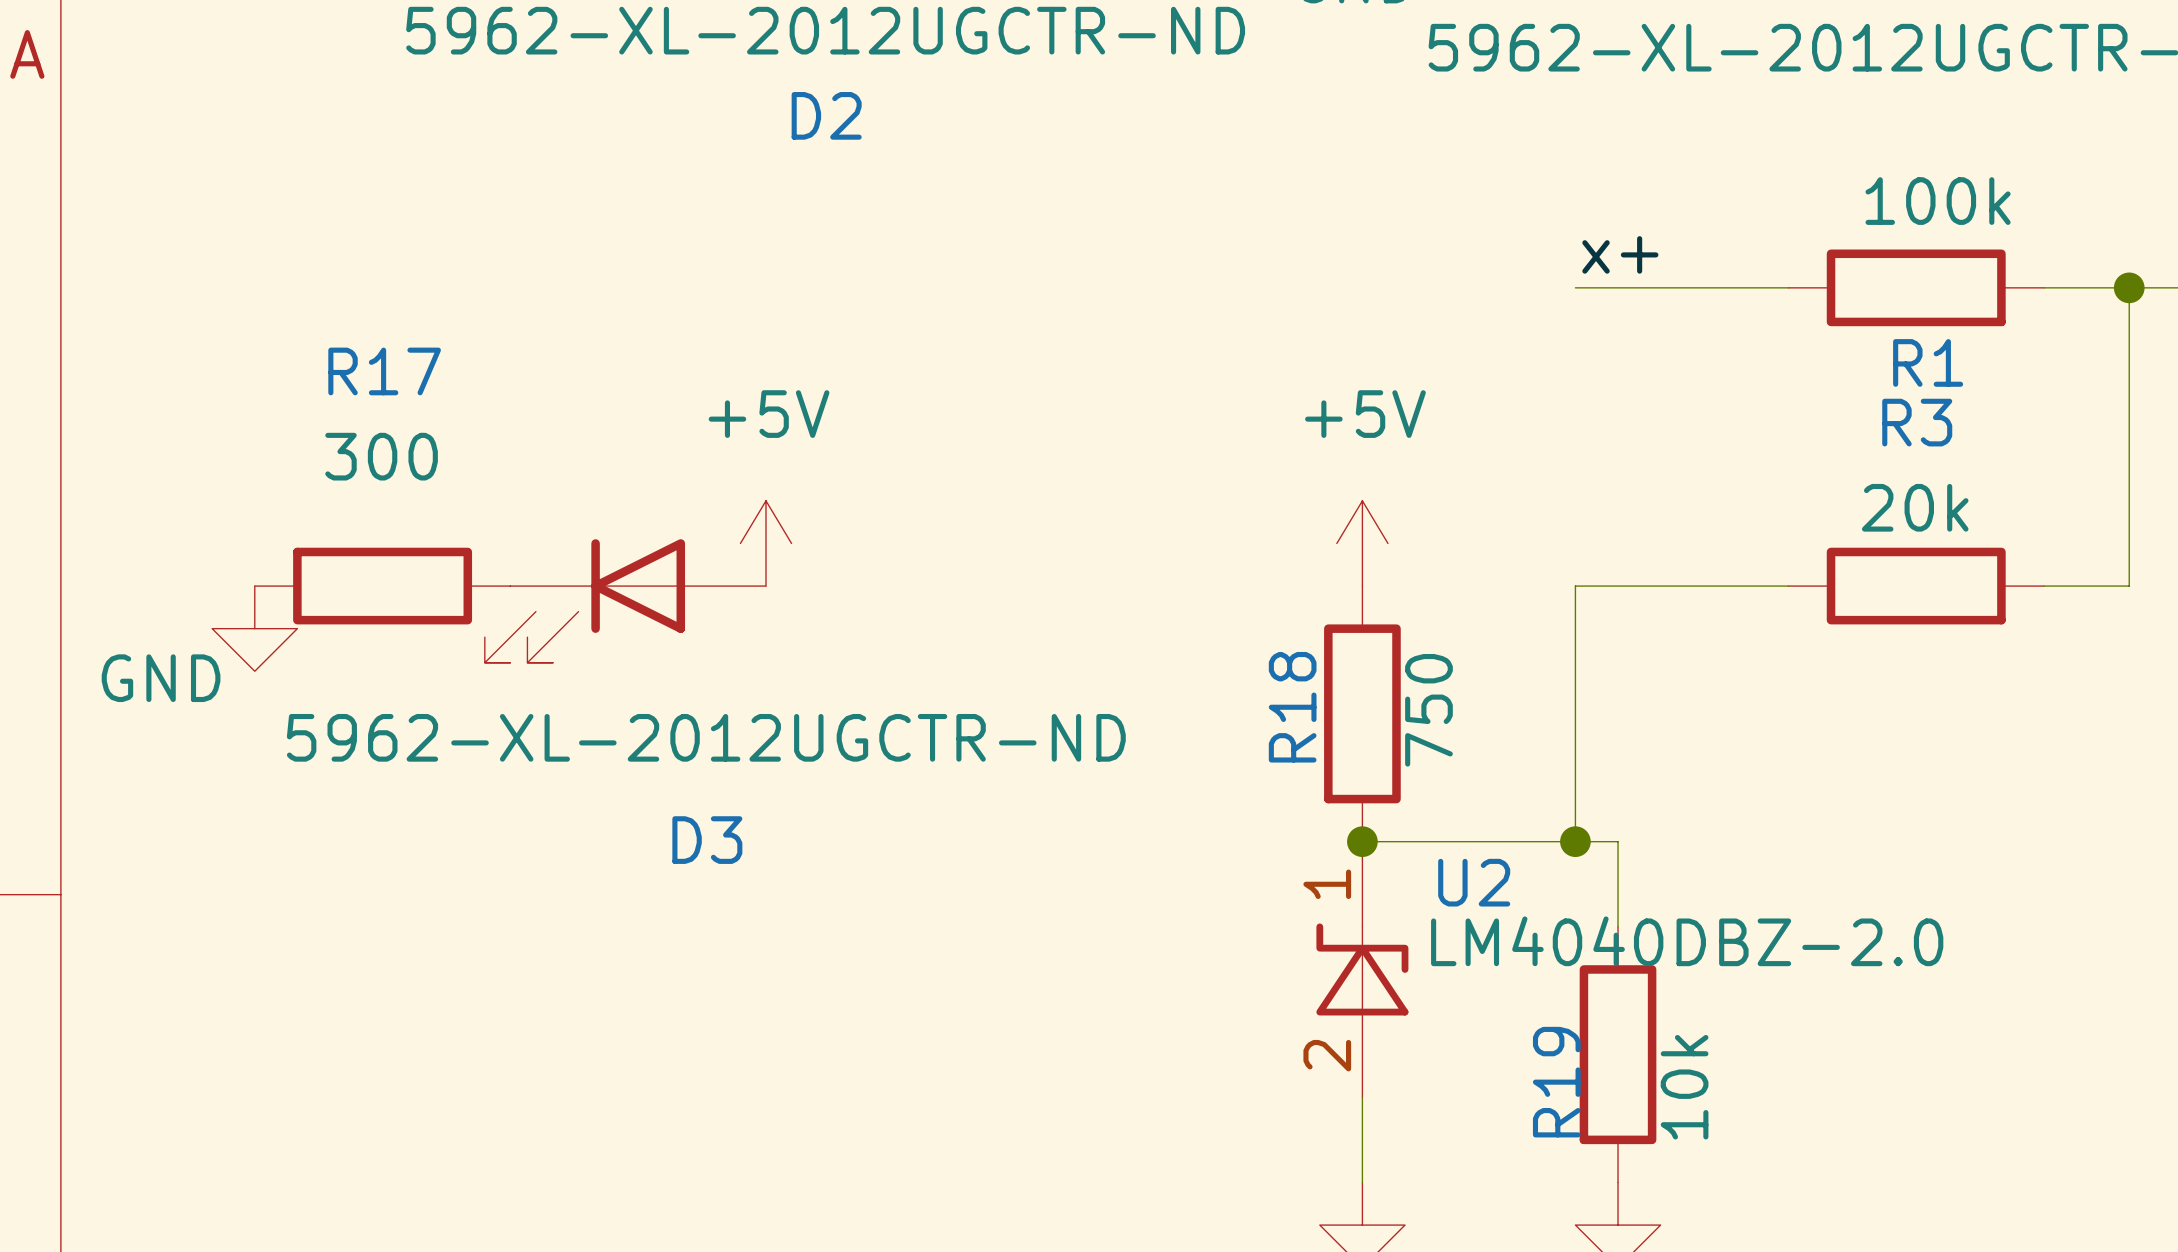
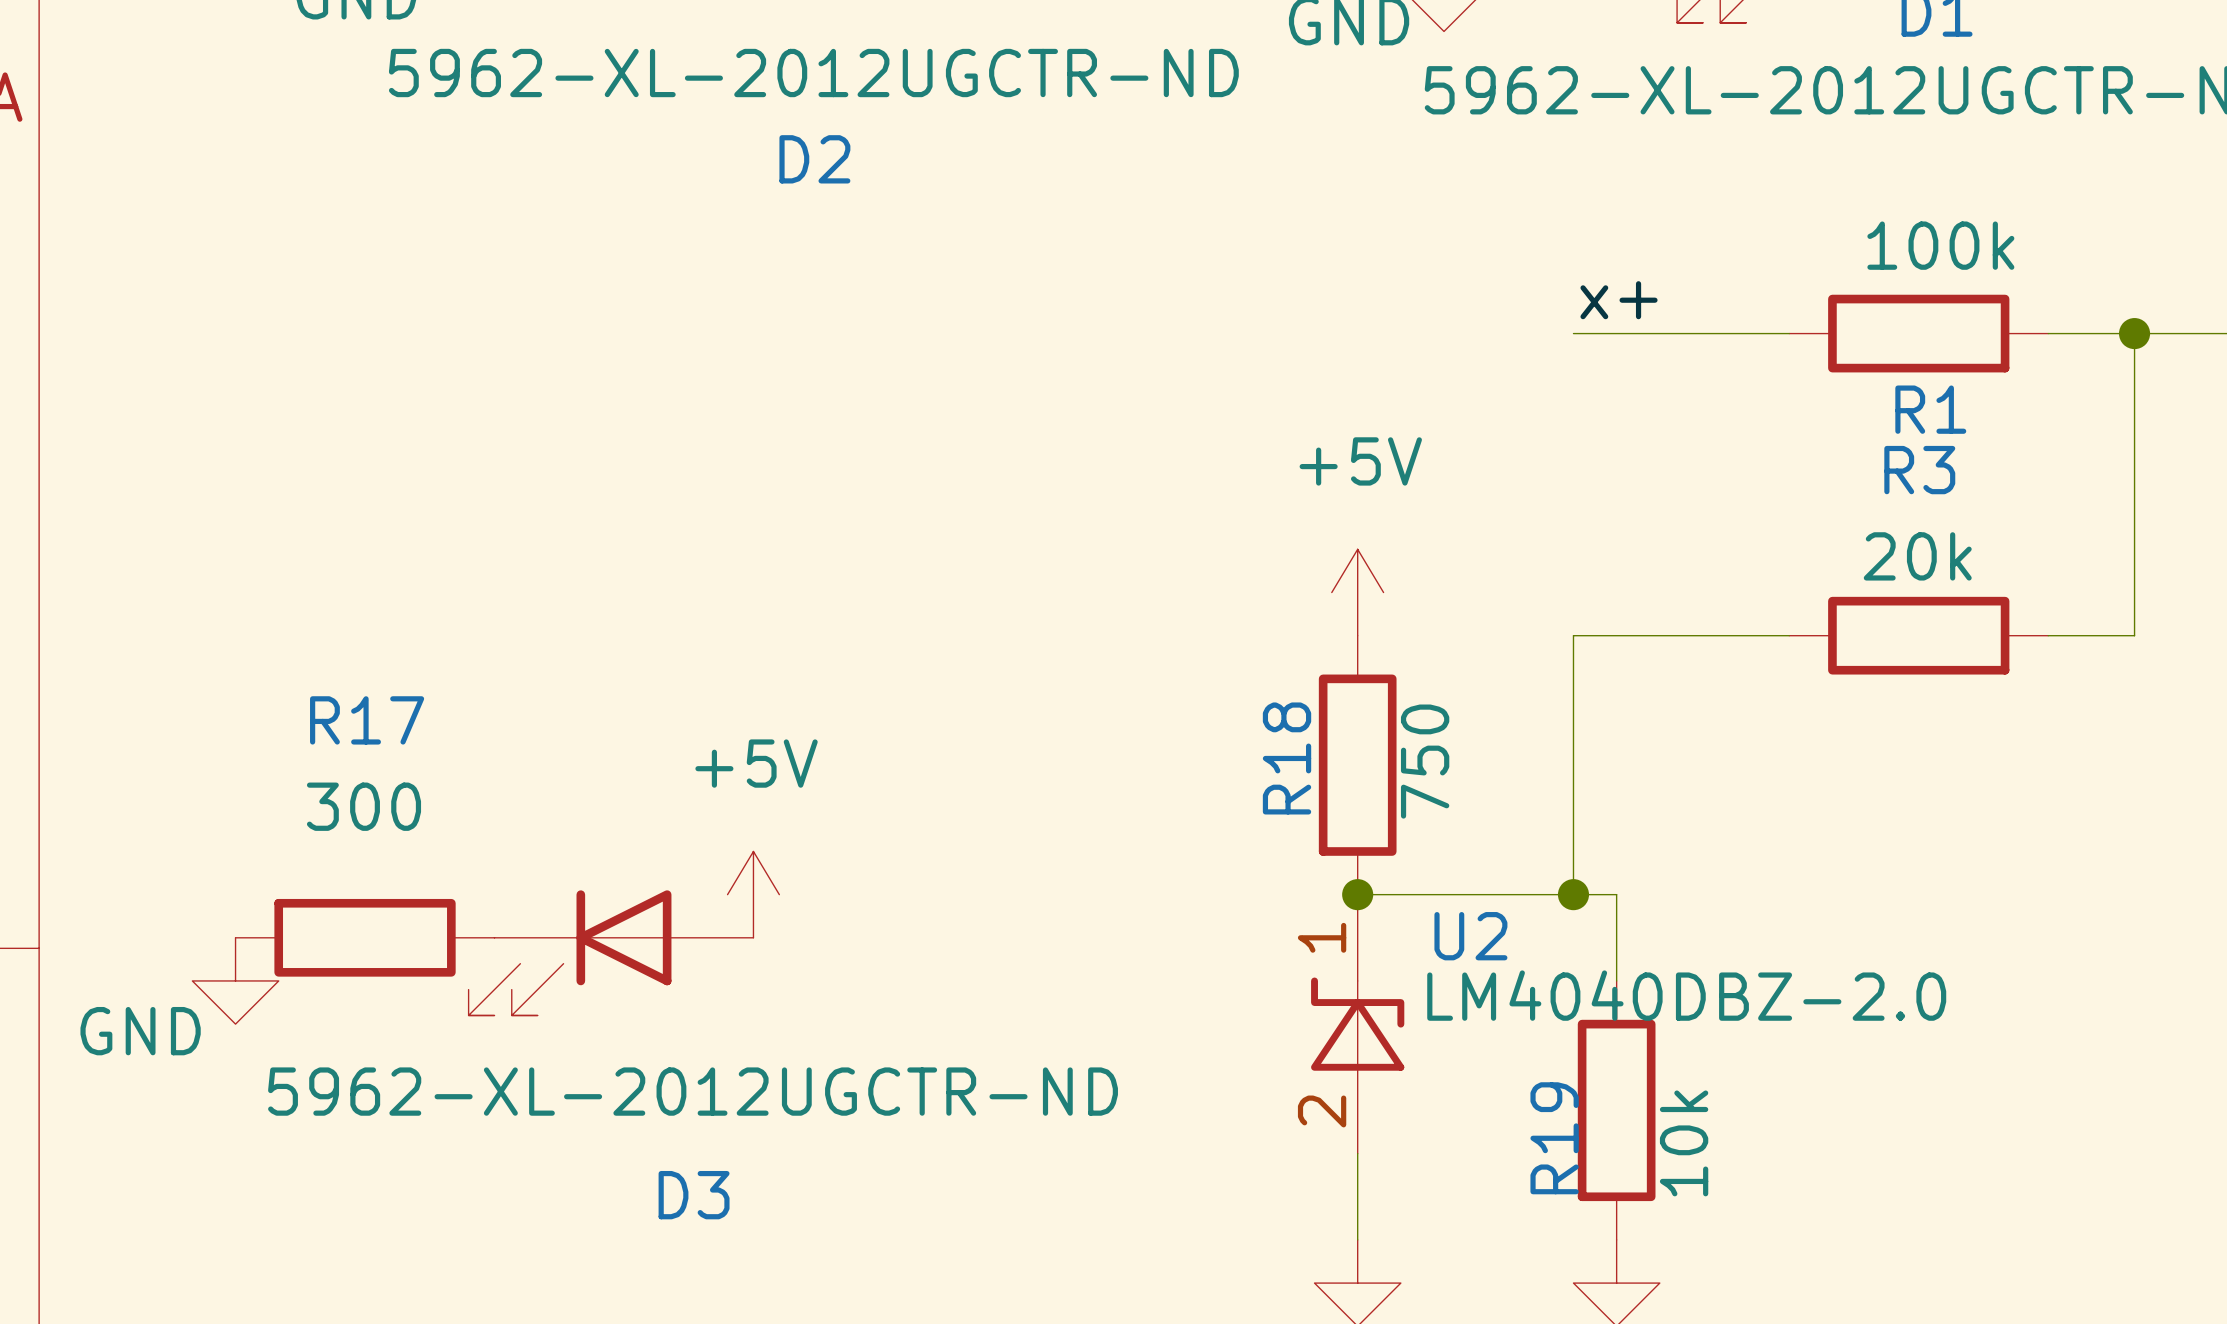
power symbol position: +5V (765, 543) -> +5V (753, 894)
R17 position: (382, 586) -> (365, 937)
D3 position: (625, 600) -> (611, 952)
power symbol position: GND (254, 628) -> GND (235, 980)

